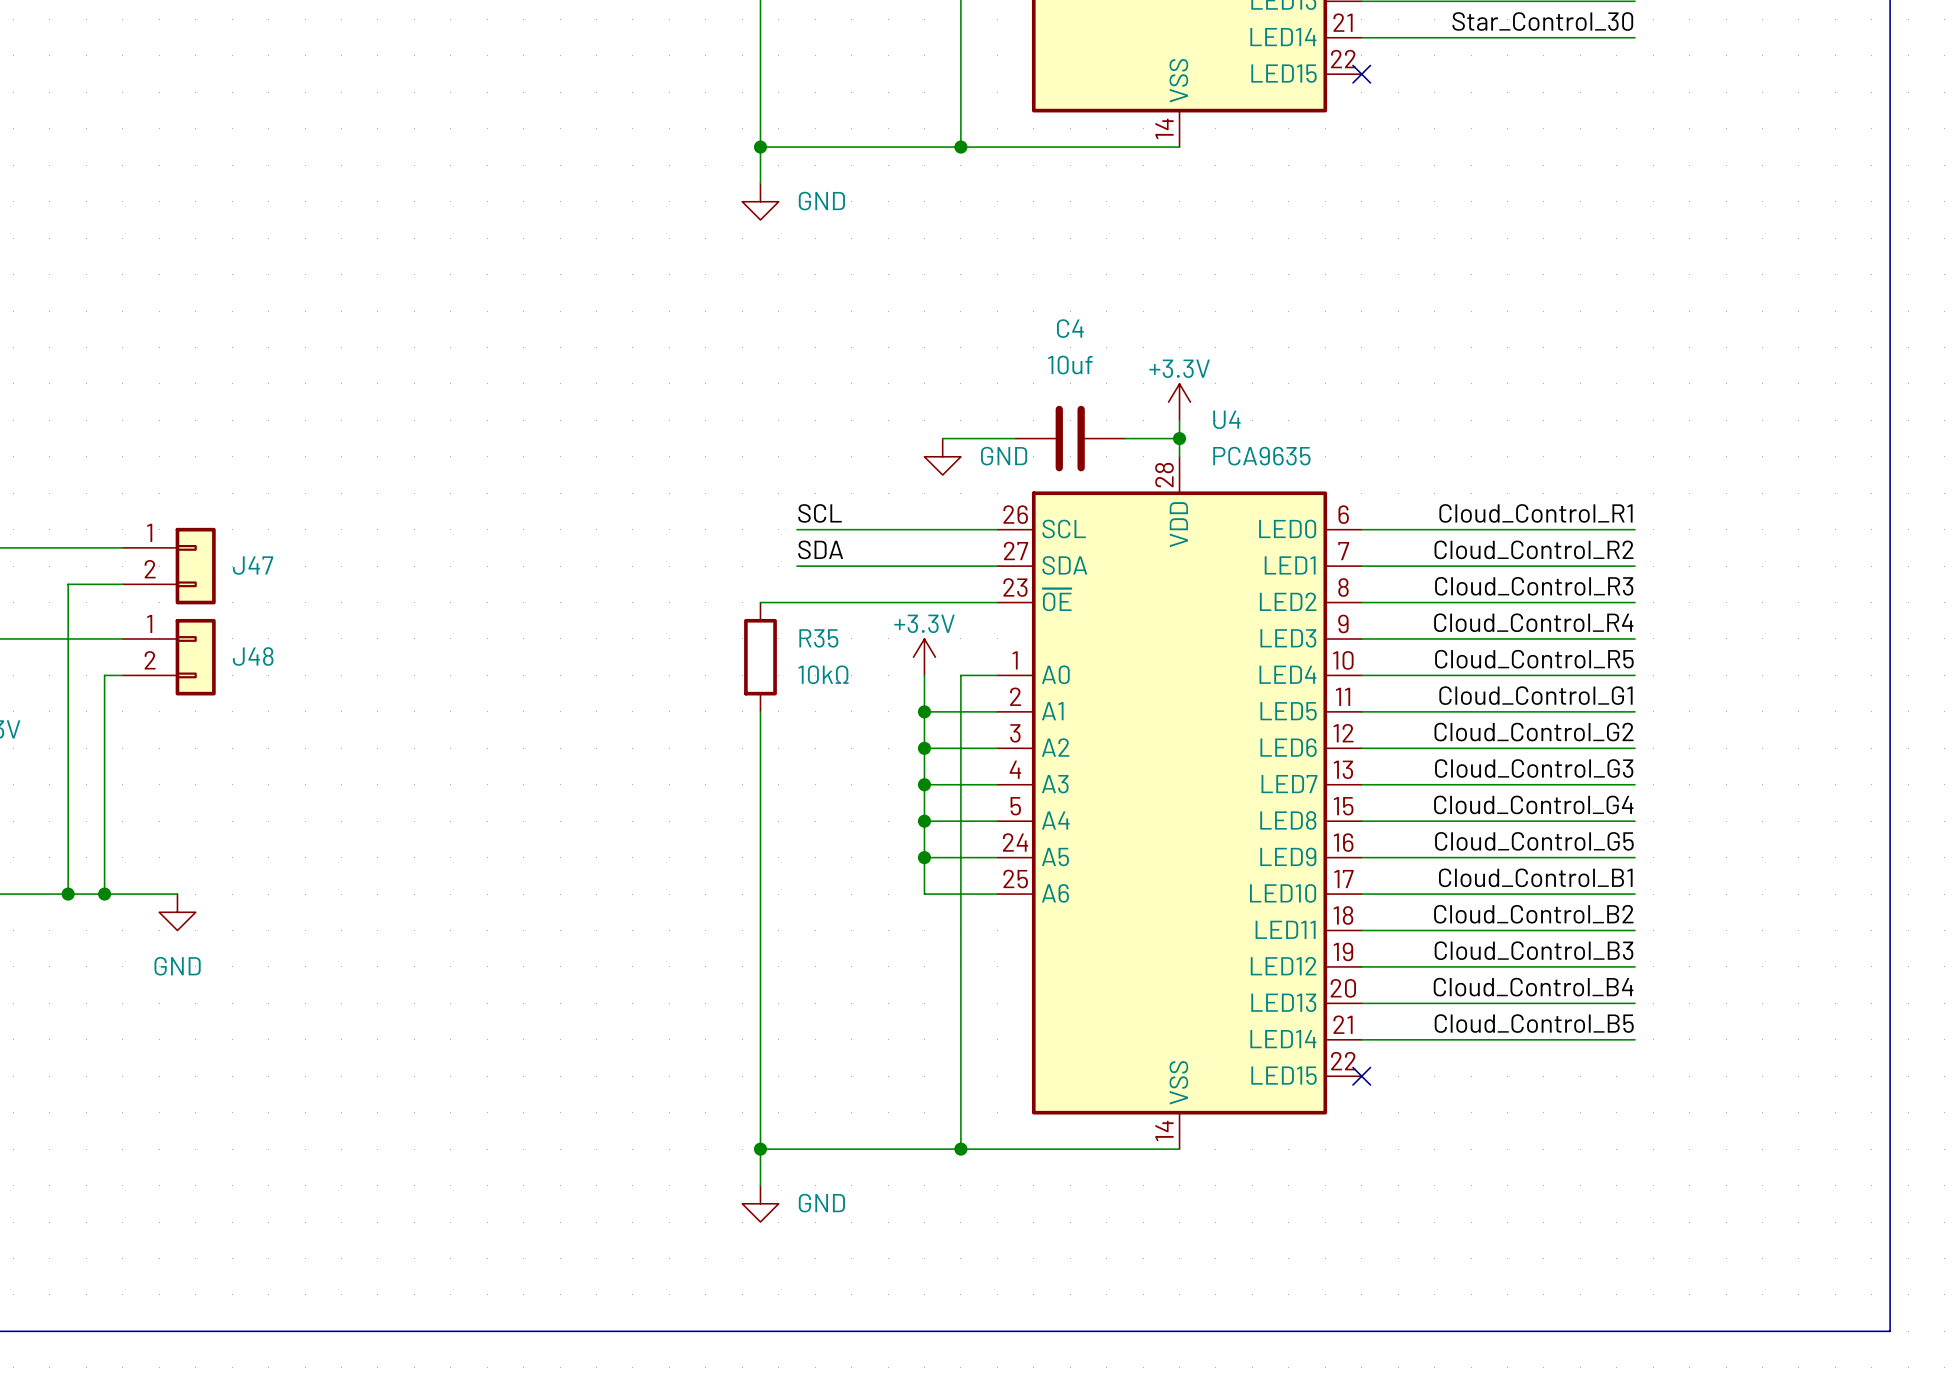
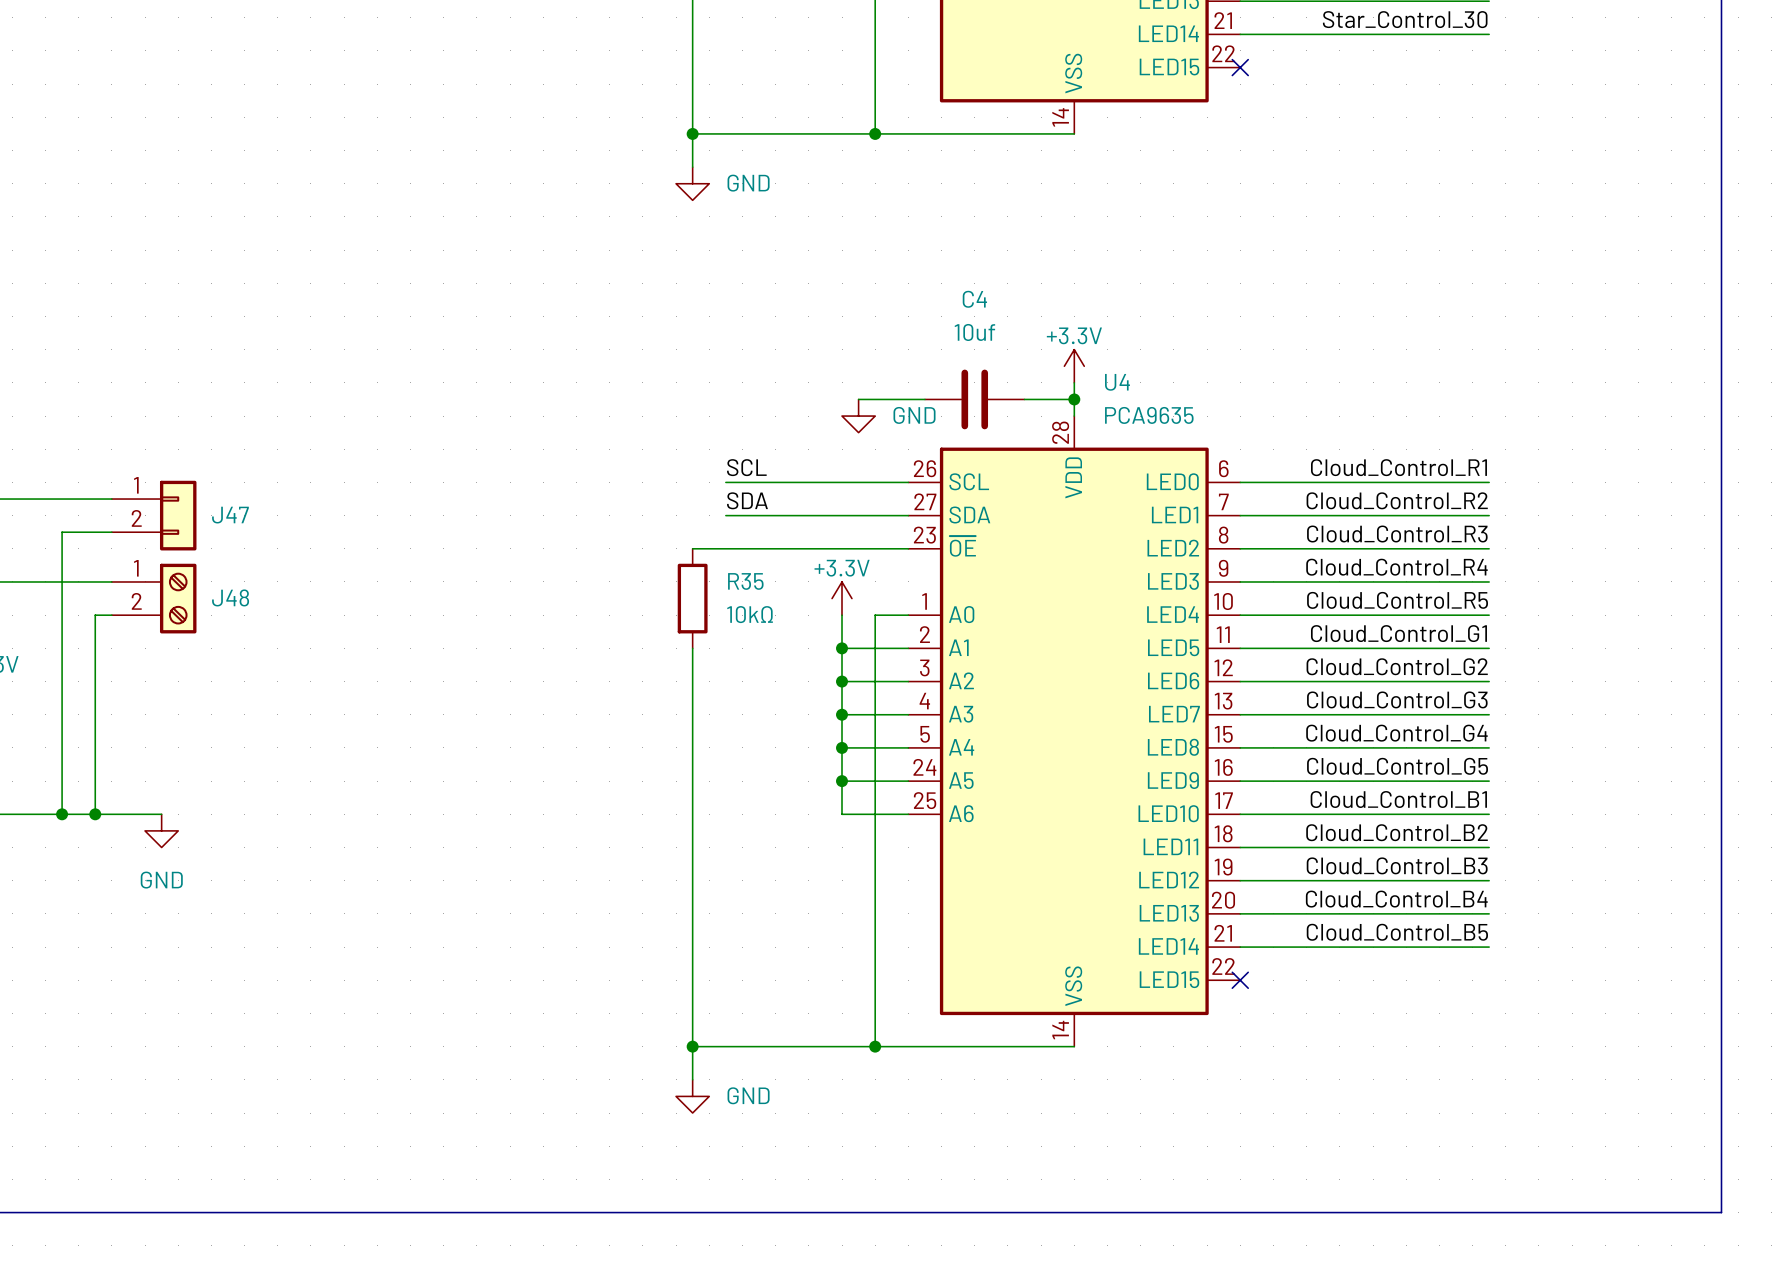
J48 symbol: [122, 618, 216, 696] -> [111, 563, 197, 634]

